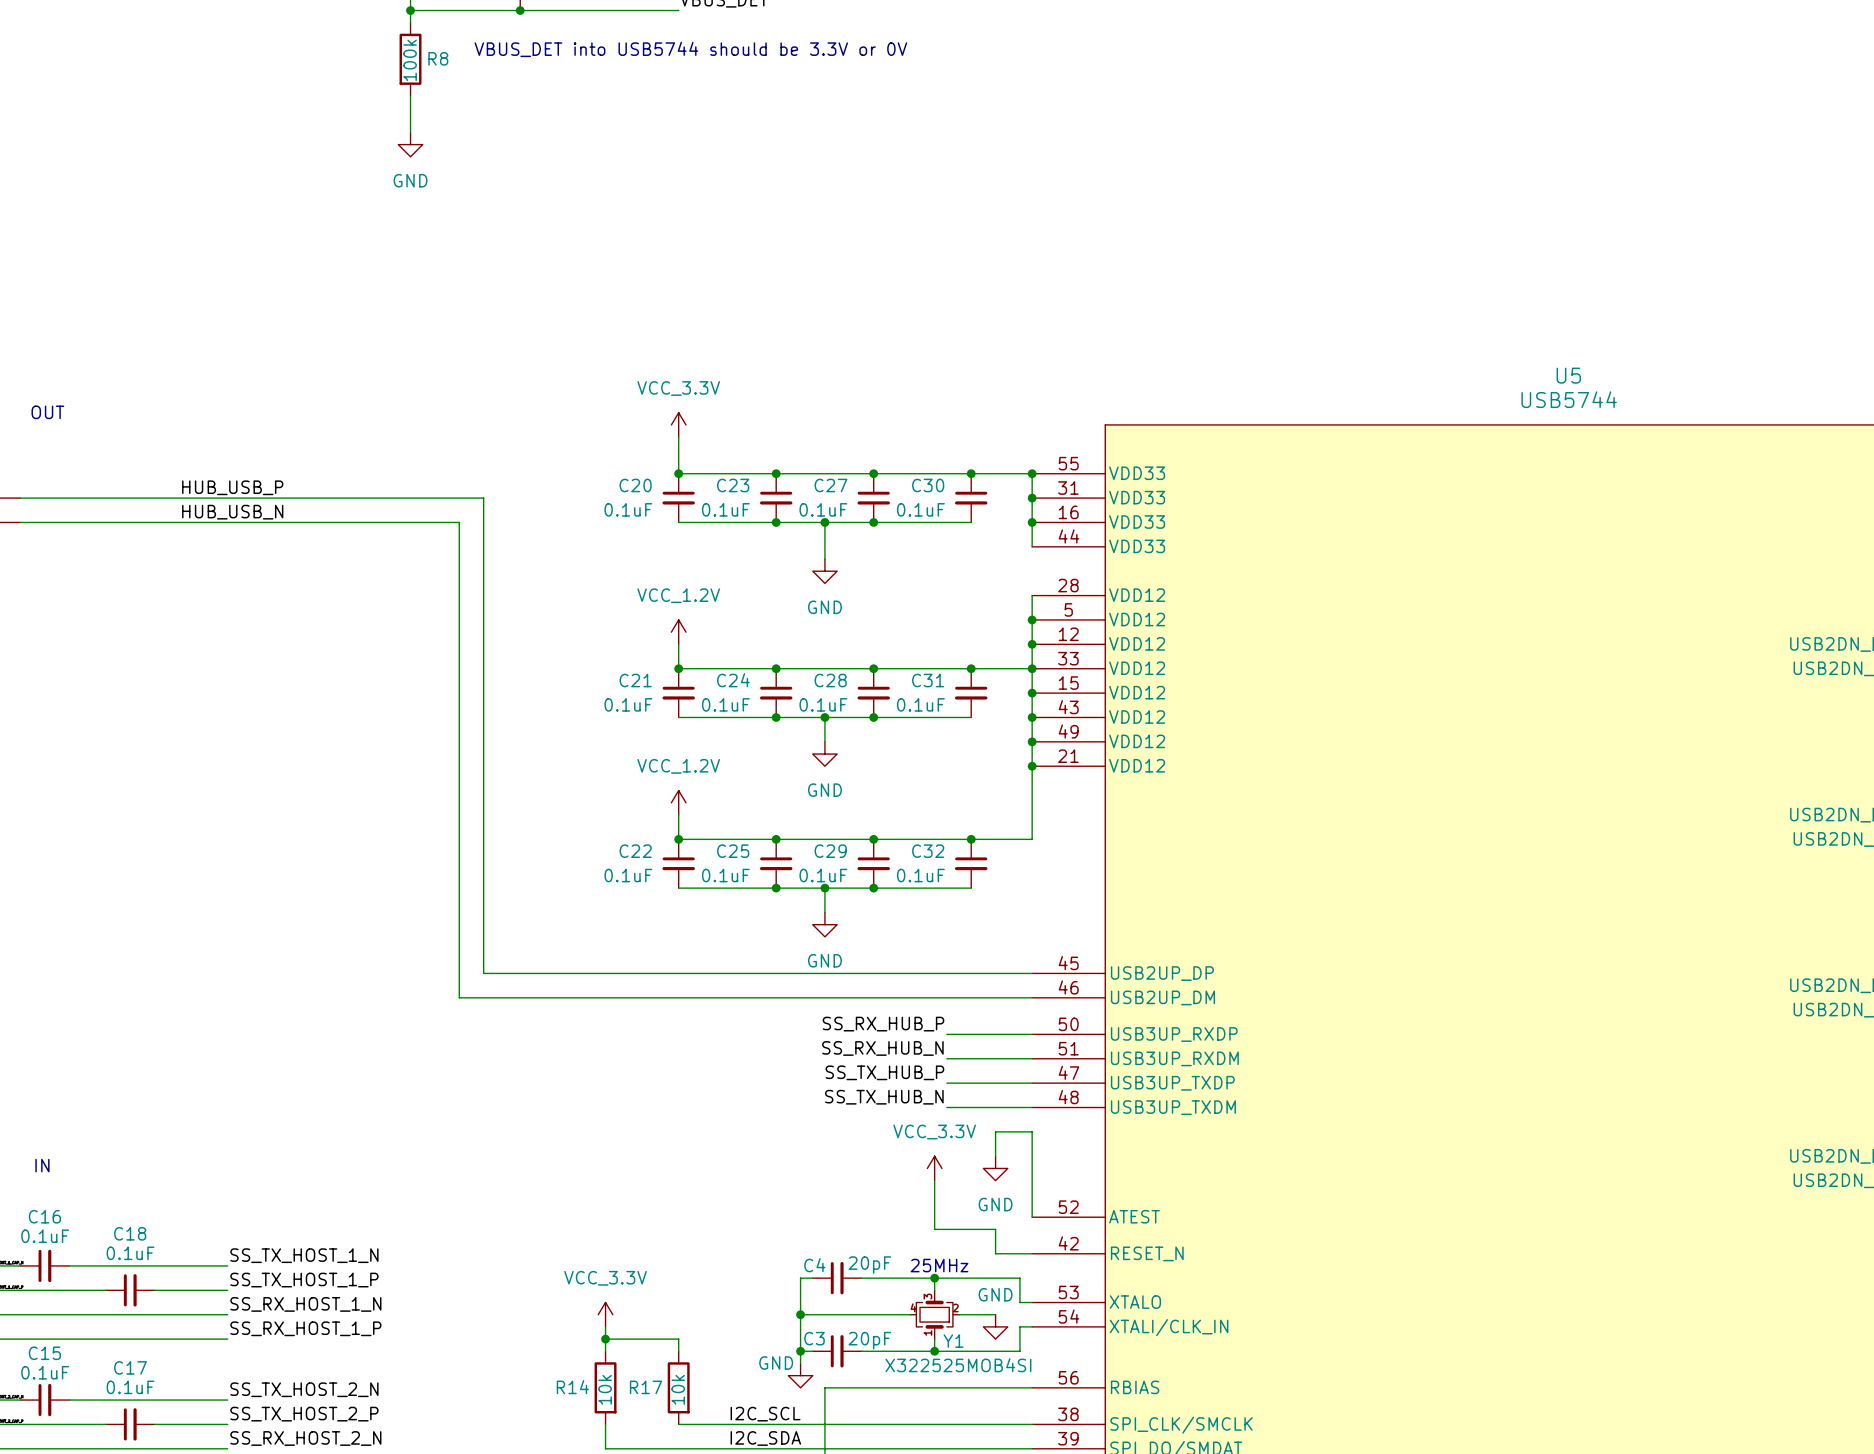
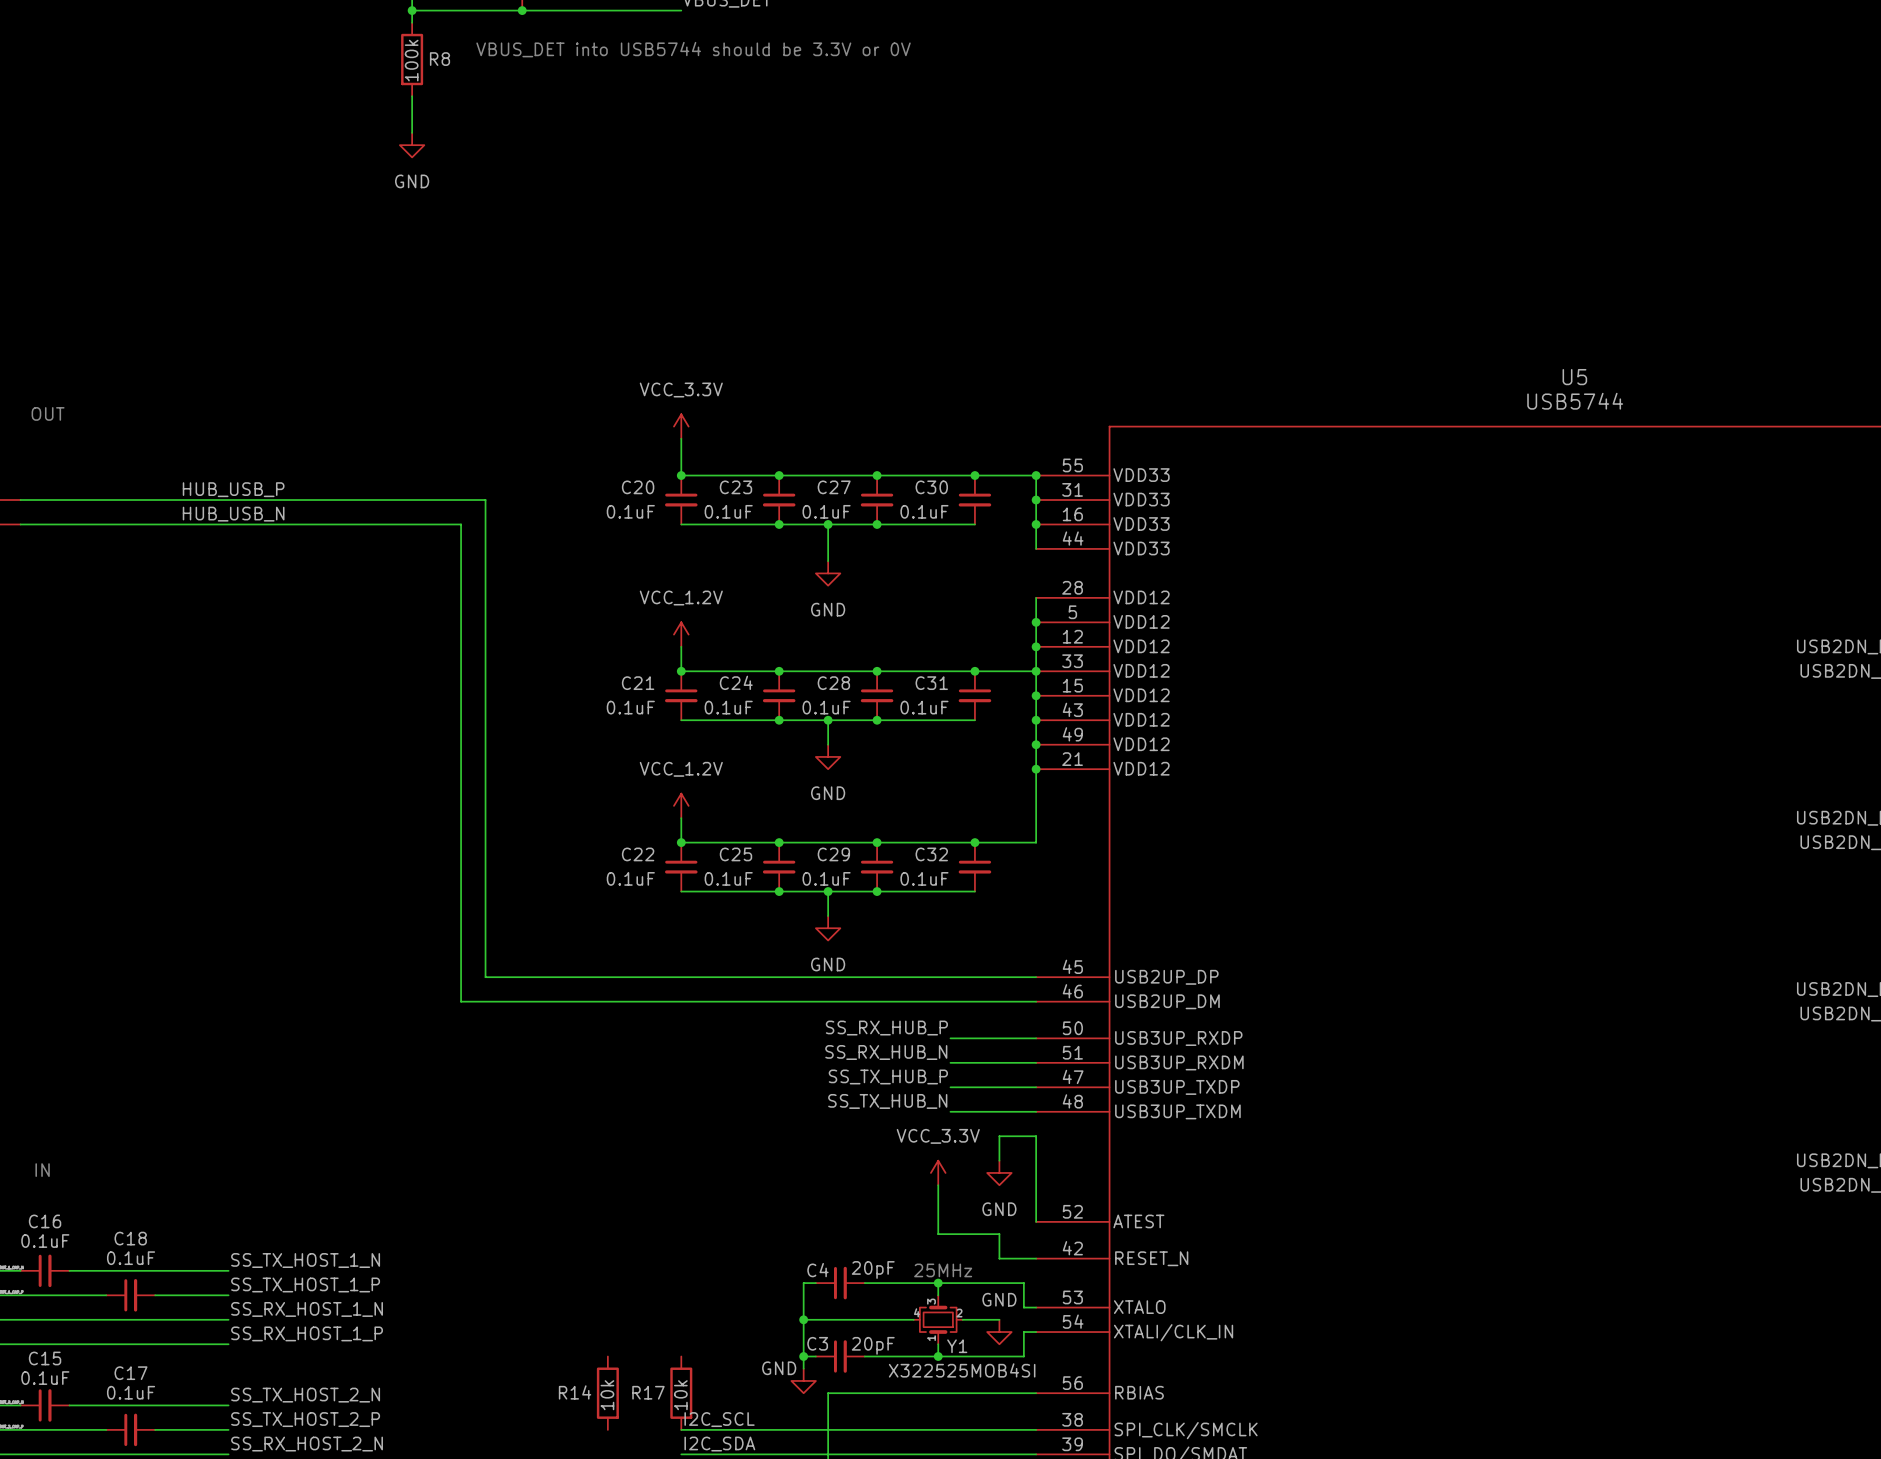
power symbol: VCC_3.3V (605, 1314) -> none
wire: (605, 1326) (605, 1351) -> none
wire: (605, 1339) (678, 1339) (678, 1351) -> none
junction: (605, 1339) -> none
label position: I2C_SCL (765, 1414) -> I2C_SCL (719, 1419)
wire: (605, 1424) (605, 1448) (678, 1448) -> none
label position: I2C_SDA (765, 1438) -> I2C_SDA (719, 1444)

